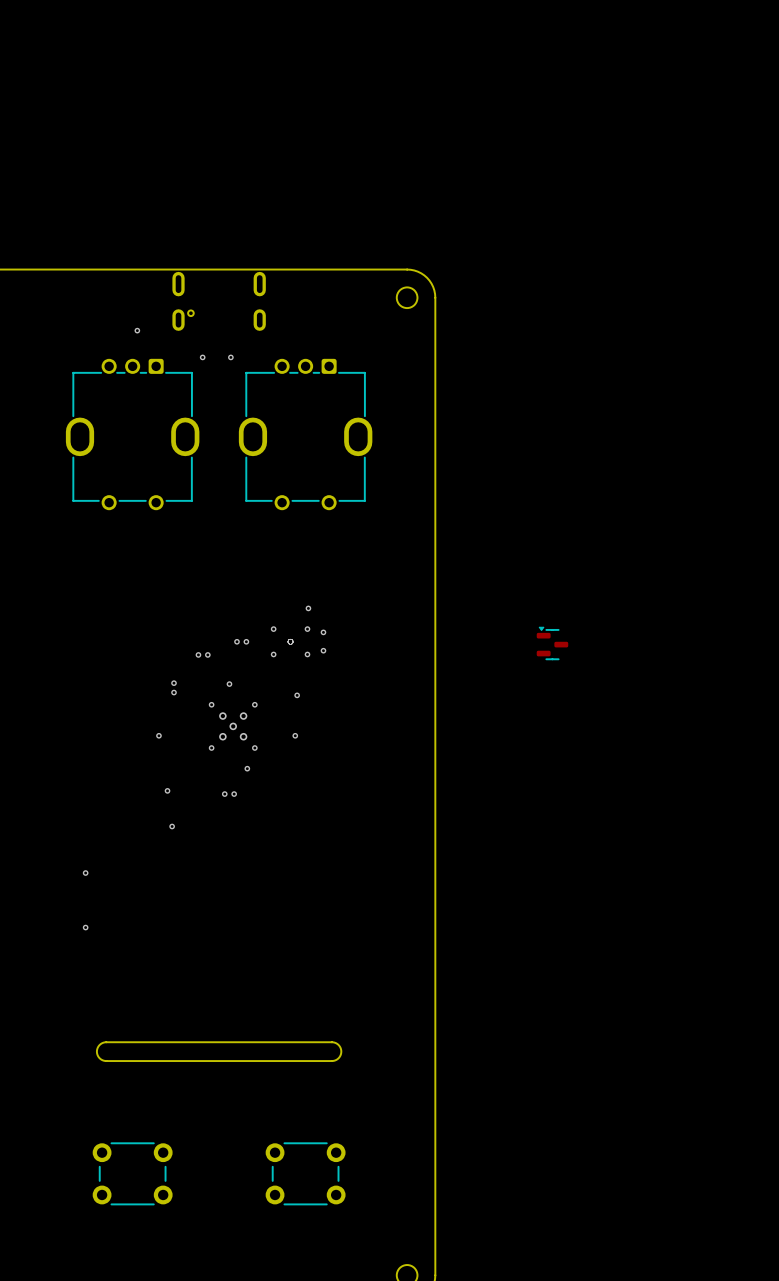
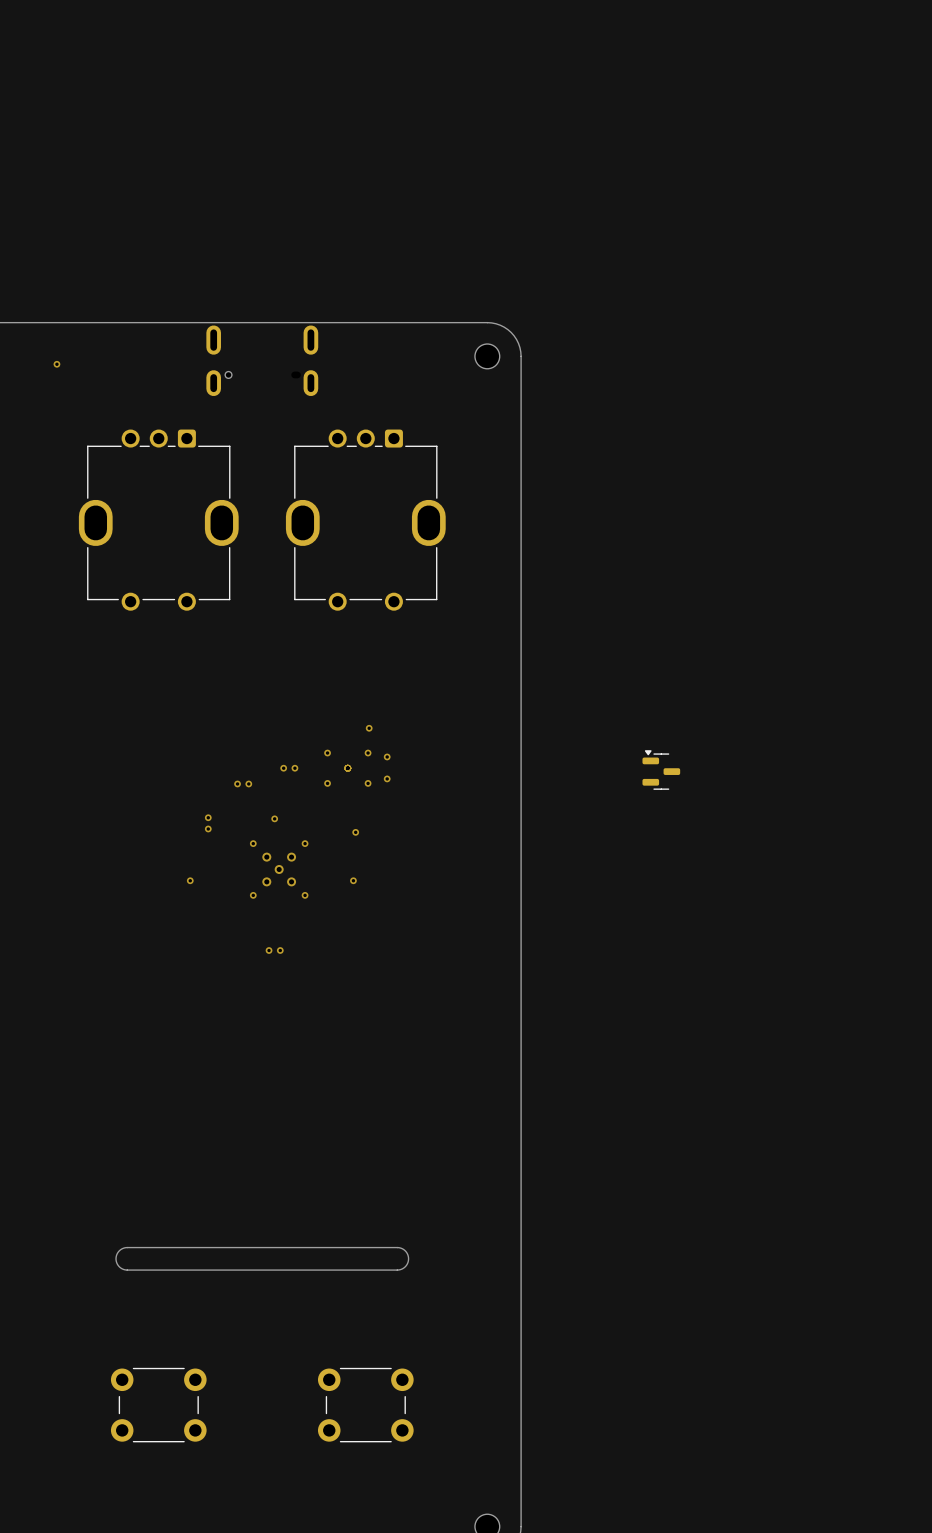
via: none -> (56, 364)
via: (137, 330) -> none
via: (202, 357) -> none
via: (230, 357) -> none
via: (247, 768) -> none
via: (167, 790) -> none
via: (172, 826) -> none
via: (85, 873) -> none
via: (85, 927) -> none

